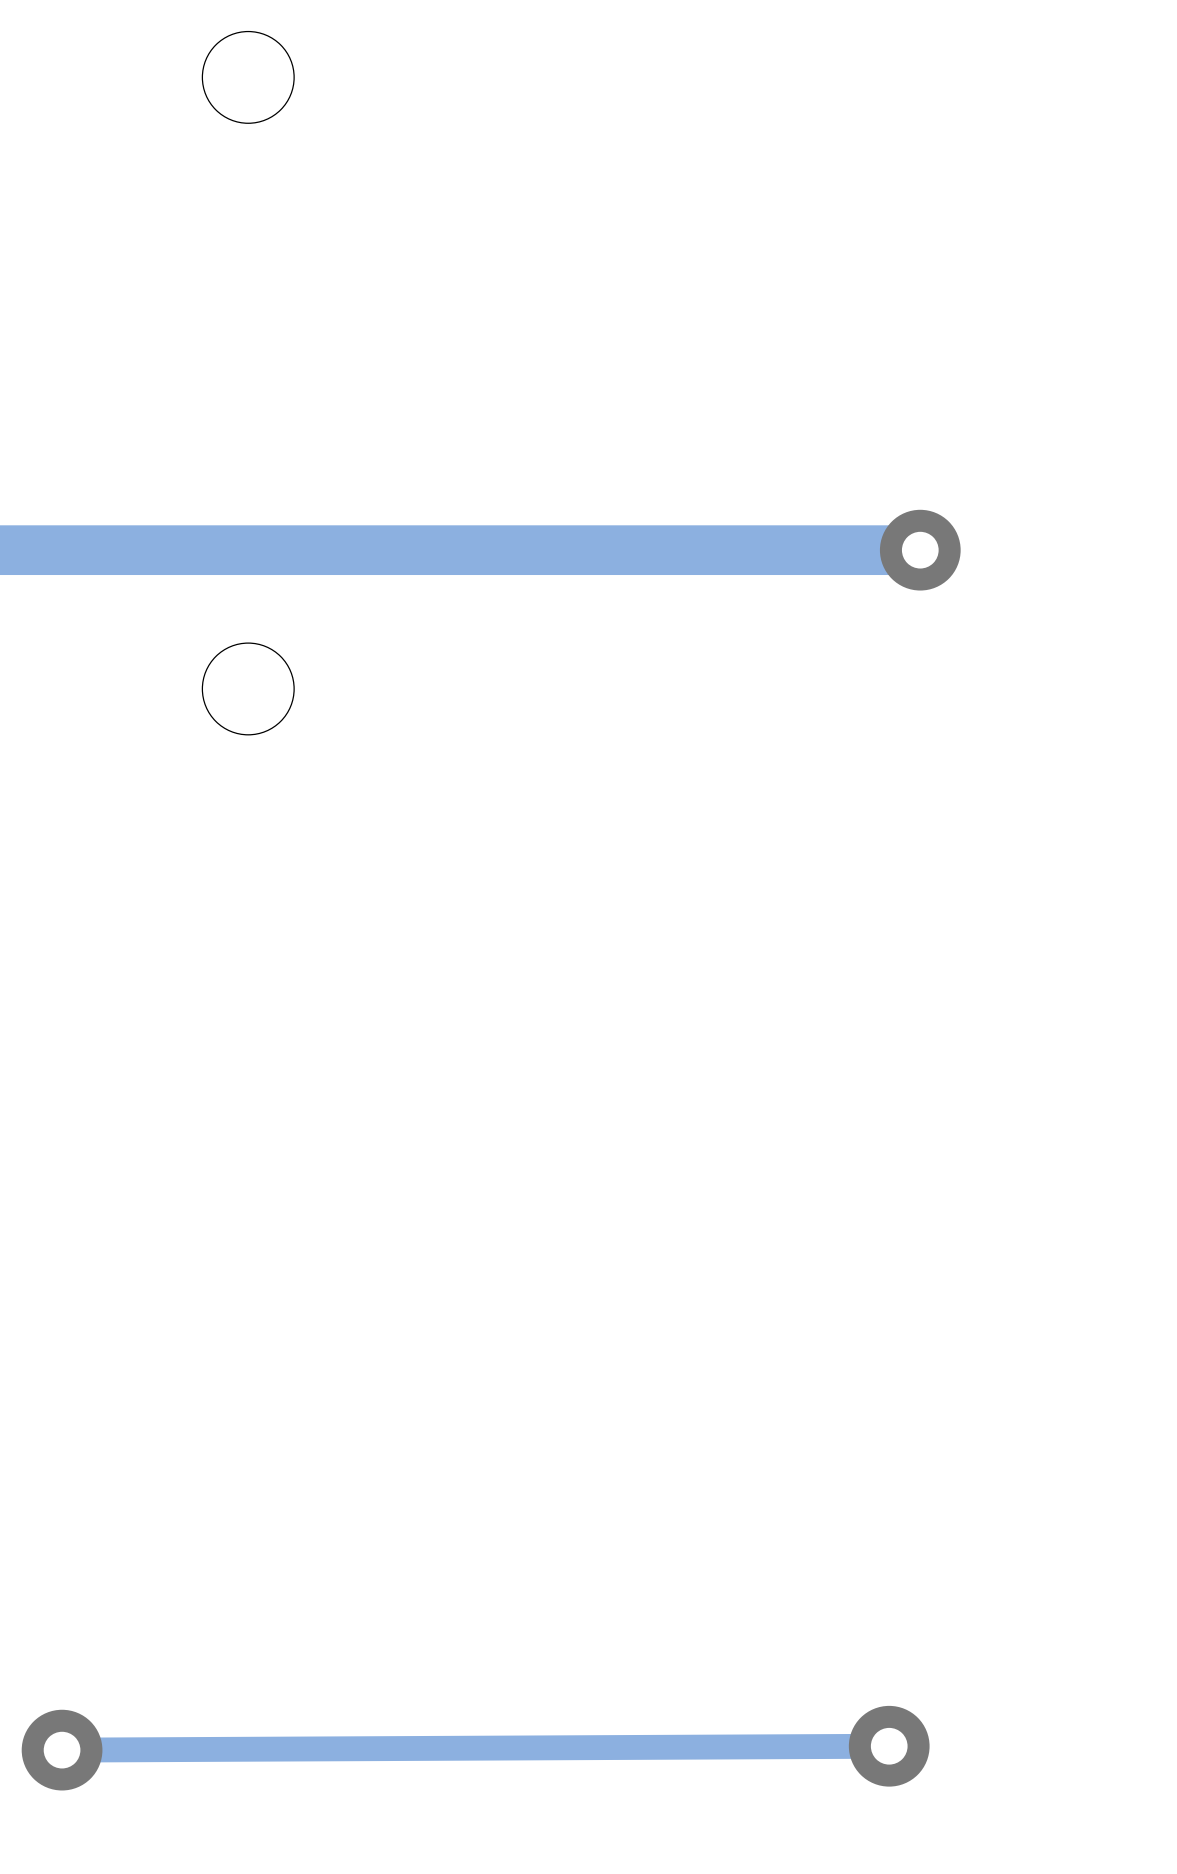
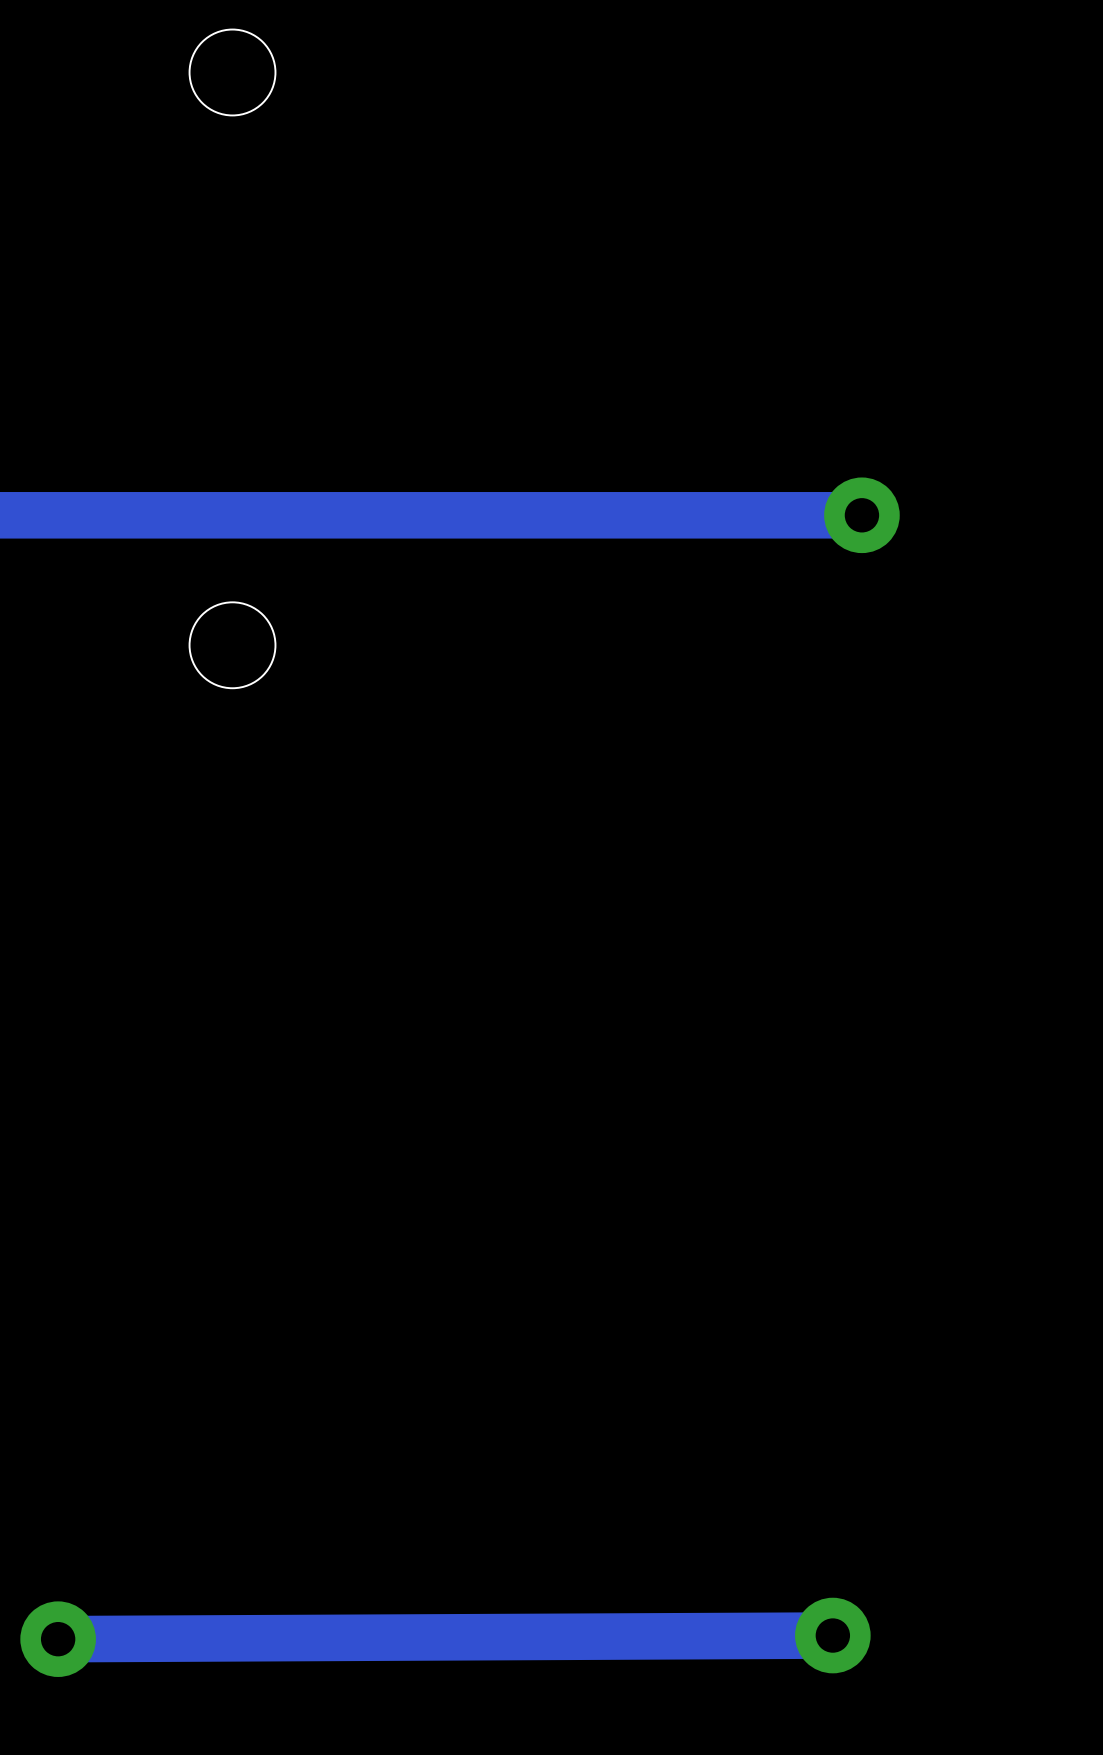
track width: thin (889, 1746) (62, 1750) -> thick (832, 1635) (58, 1639)

